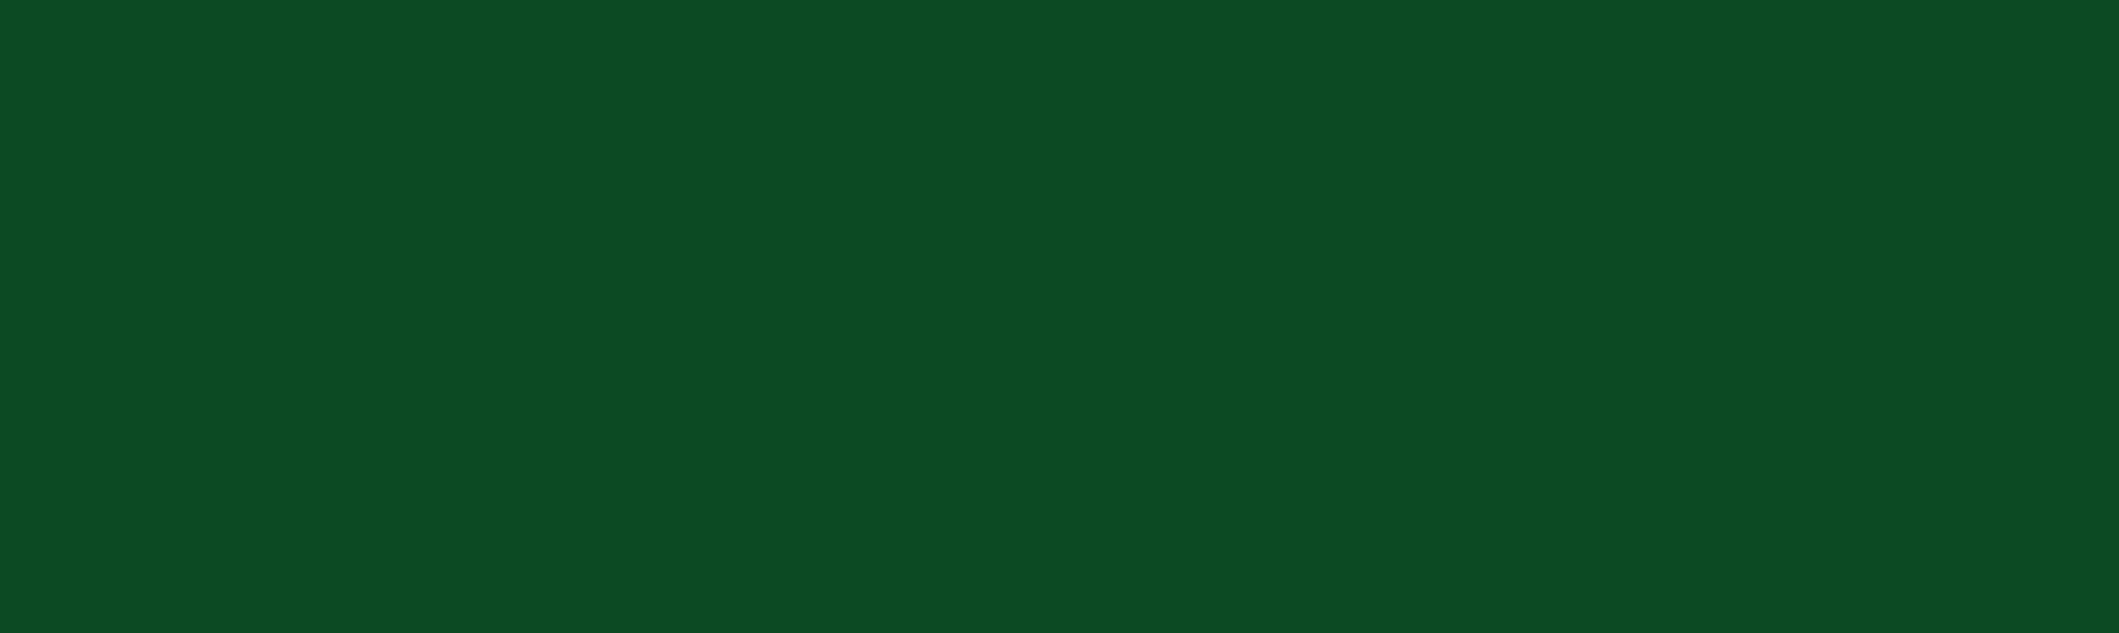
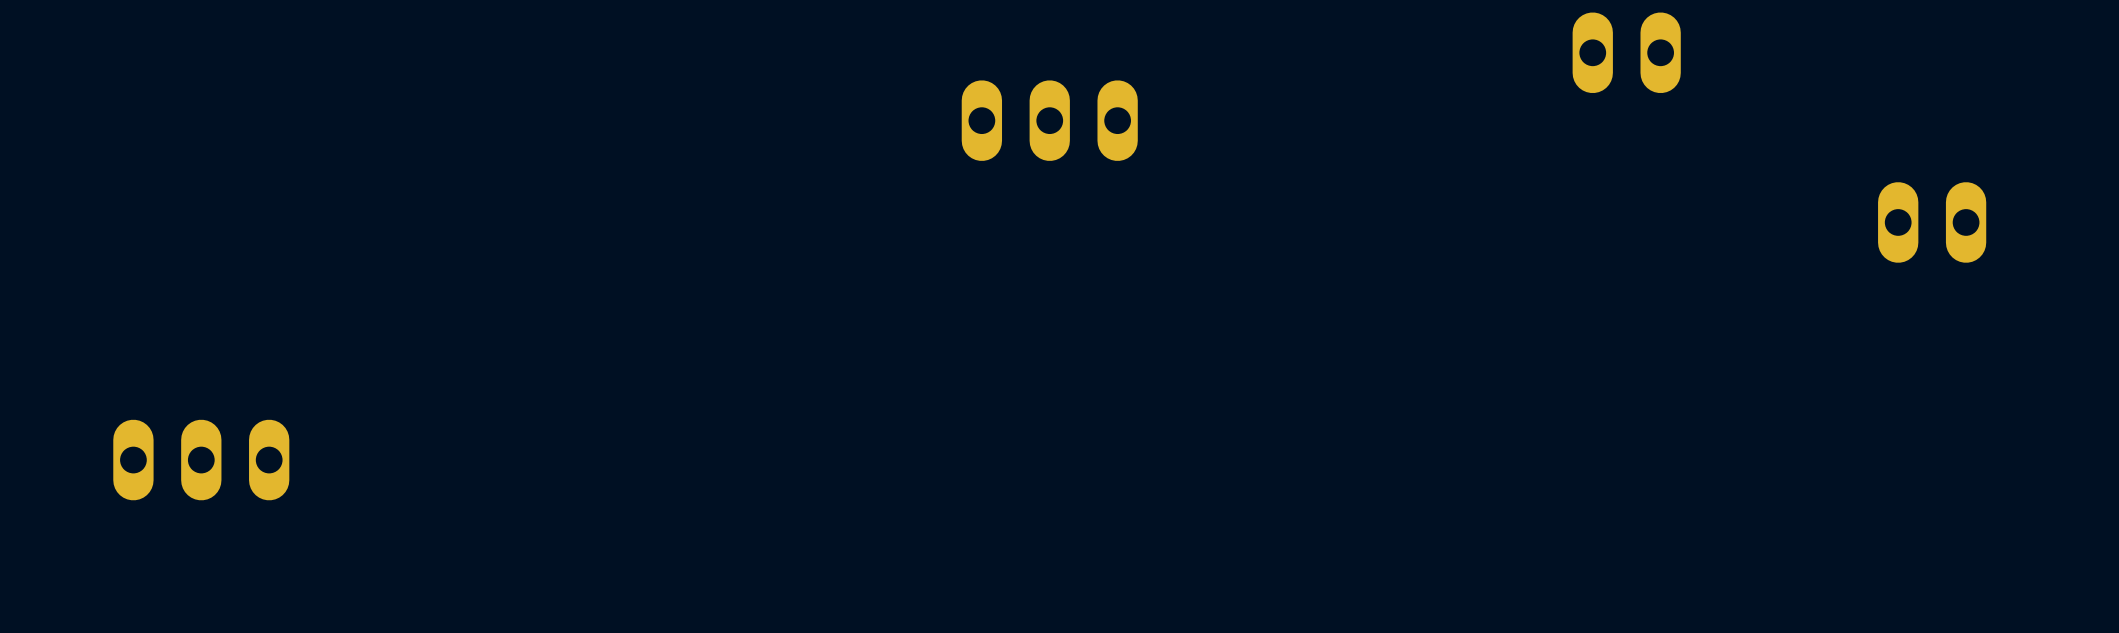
part: none -> (1626, 52)
part: none -> (1049, 120)
part: none -> (1932, 222)
part: none -> (201, 460)

